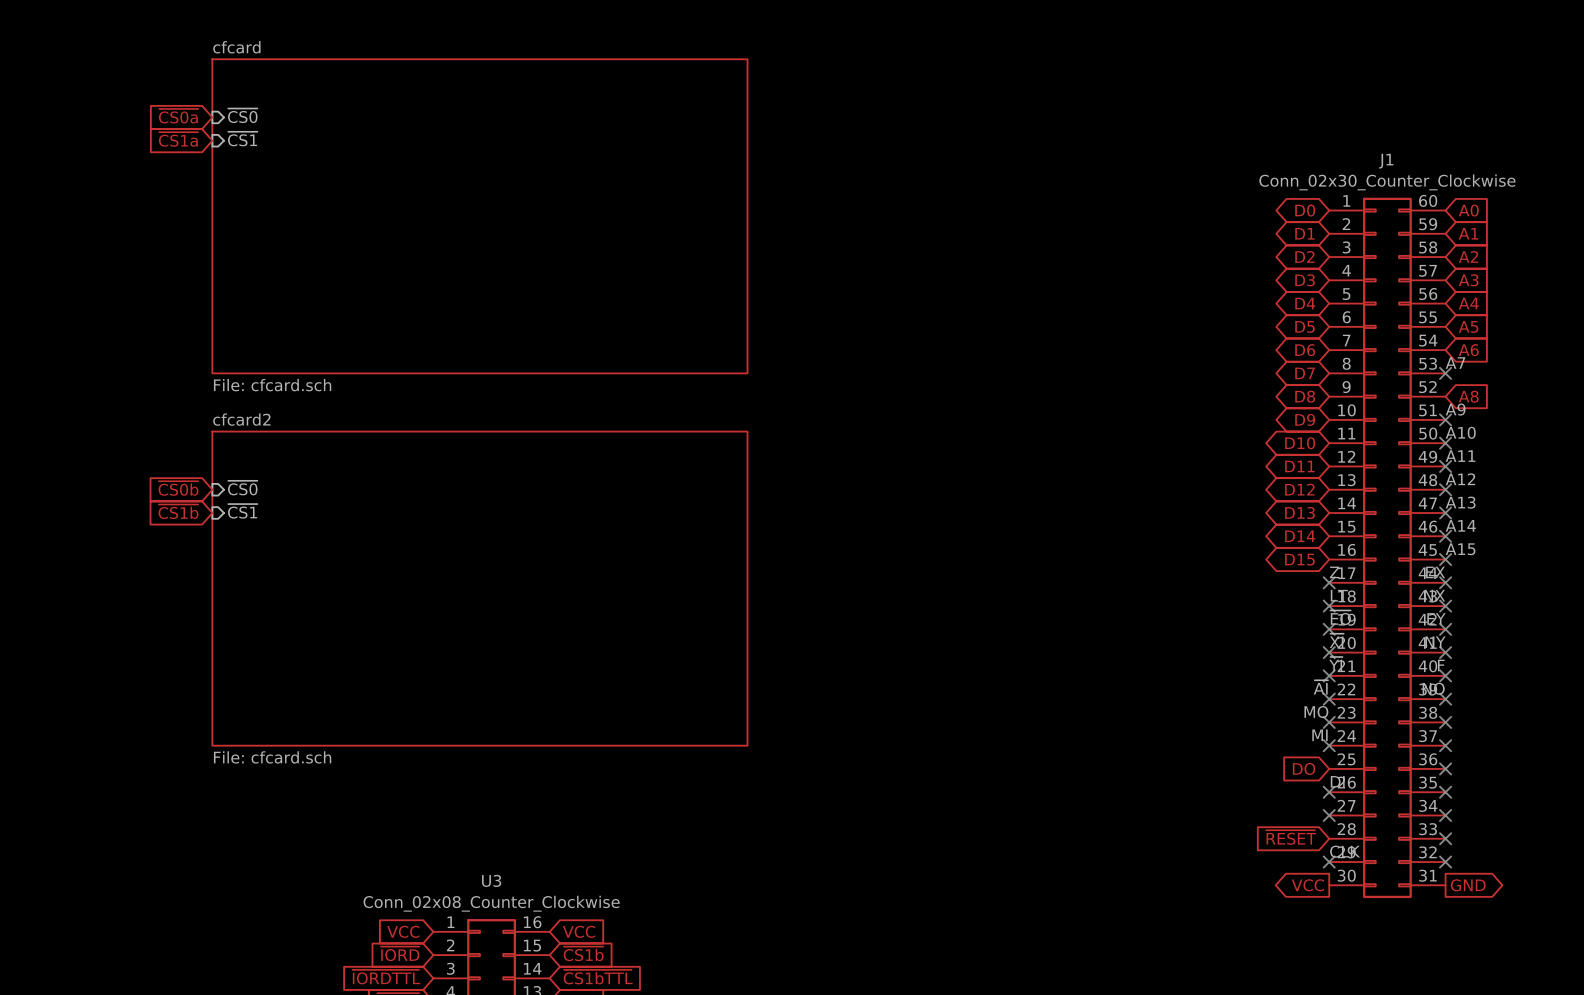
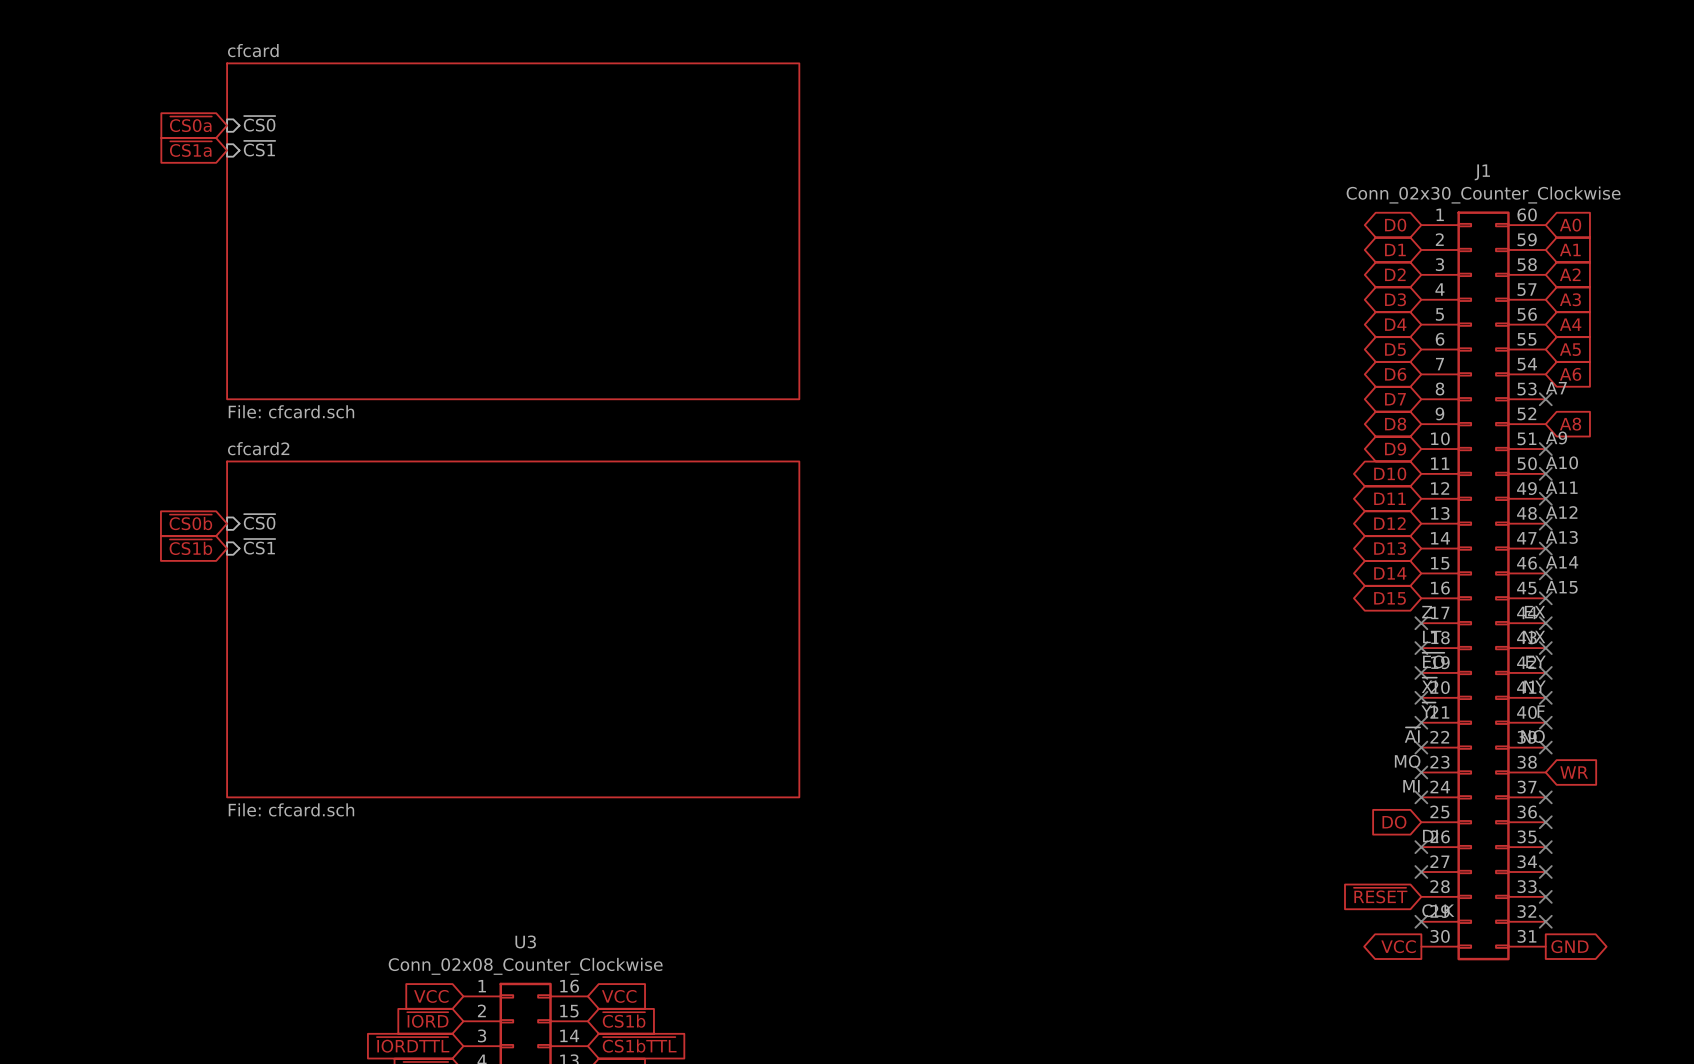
no-connect mark: (1445, 722) -> none
global label: none -> WR (1574, 772)

